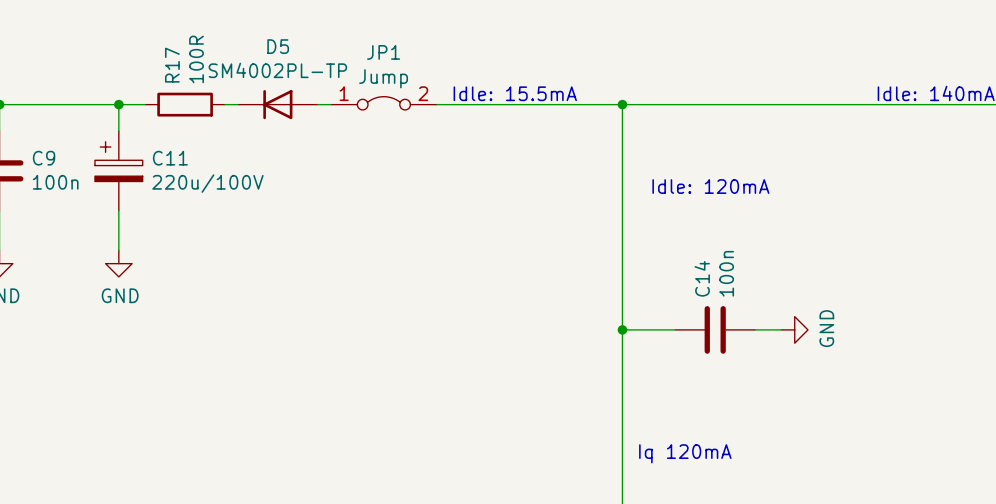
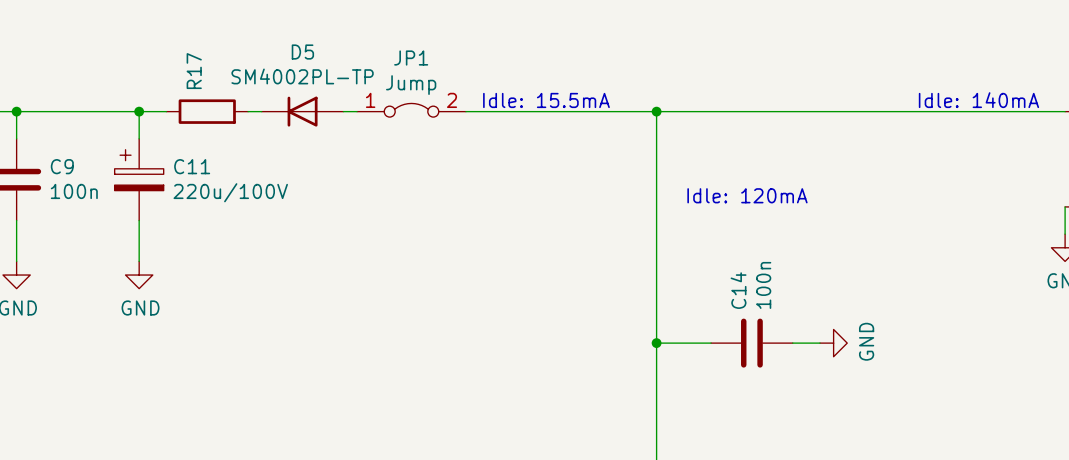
R17 value: 100R (196, 59) -> none

